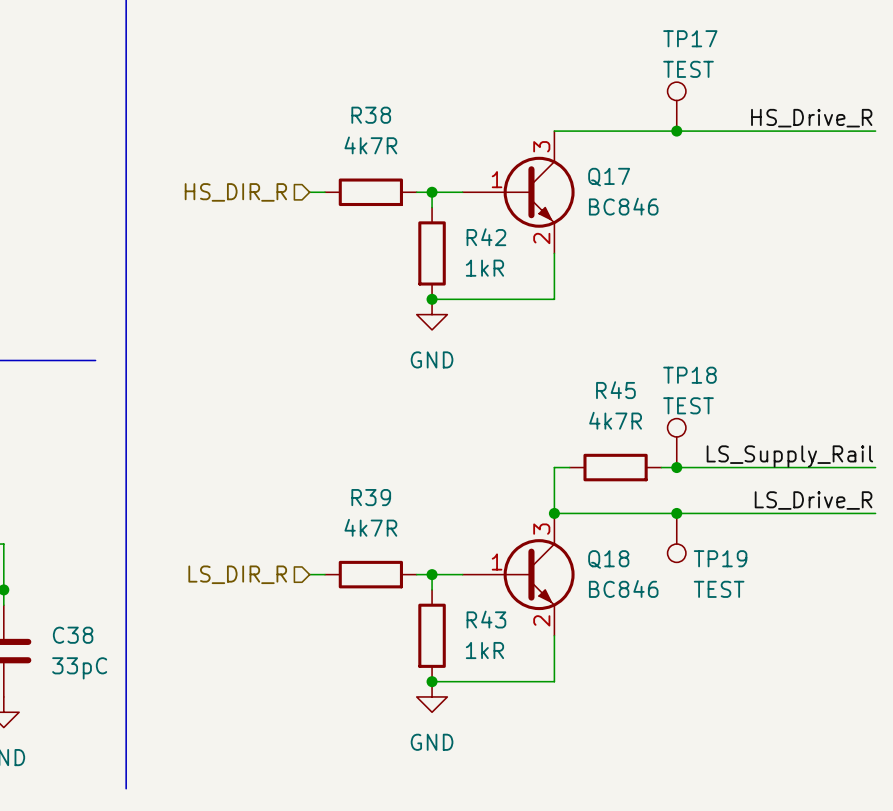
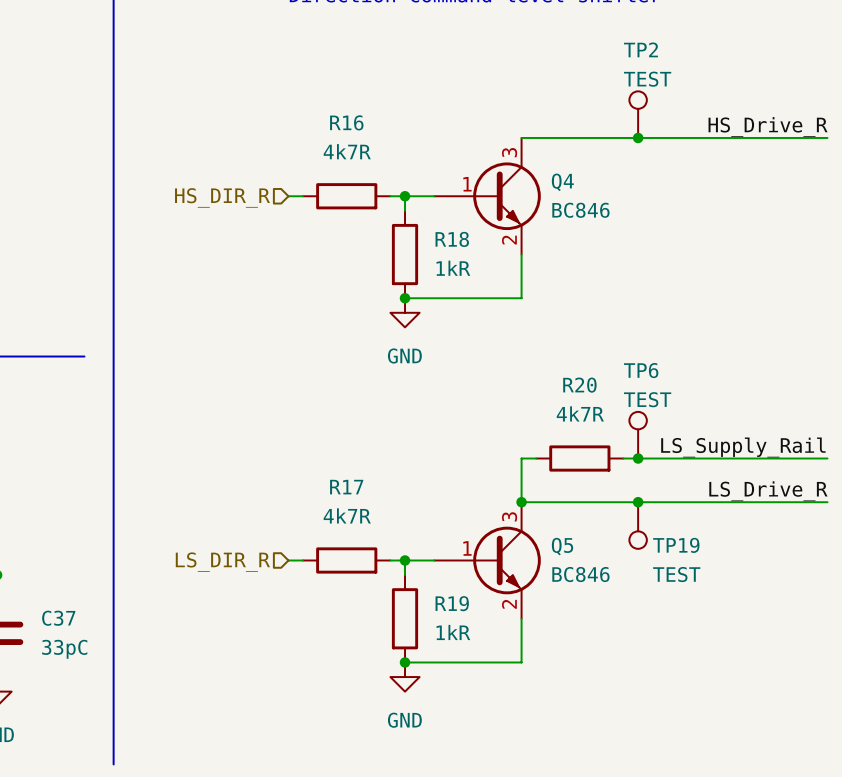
TP17 name: TP17 (690, 38) -> TP2 (640, 49)
R38 name: R38 (371, 115) -> R16 (346, 122)
Q17 name: Q17 (609, 177) -> Q4 (562, 182)
R42 name: R42 (486, 237) -> R18 (452, 239)
TP18 name: TP18 (689, 375) -> TP6 (641, 370)
R45 name: R45 (615, 390) -> R20 (579, 385)
R39 name: R39 (371, 497) -> R17 (346, 487)
Q18 name: Q18 (608, 559) -> Q5 (562, 546)
R43 name: R43 (486, 619) -> R19 (452, 603)
C38 name: C38 (73, 635) -> C37 (58, 618)

